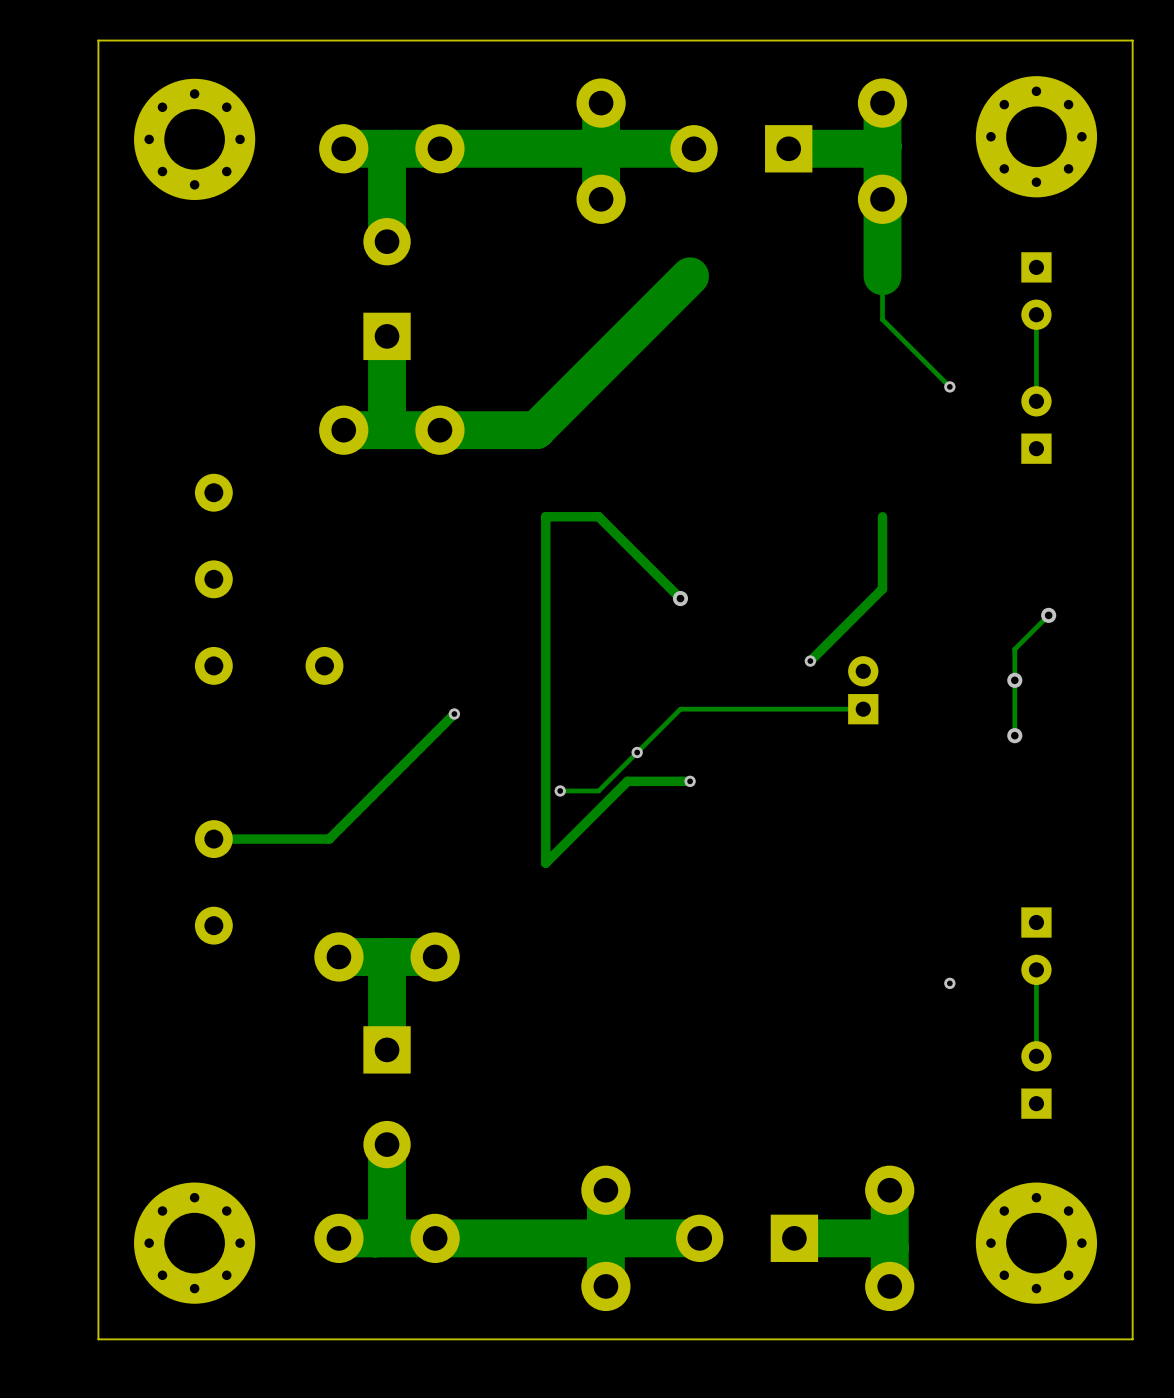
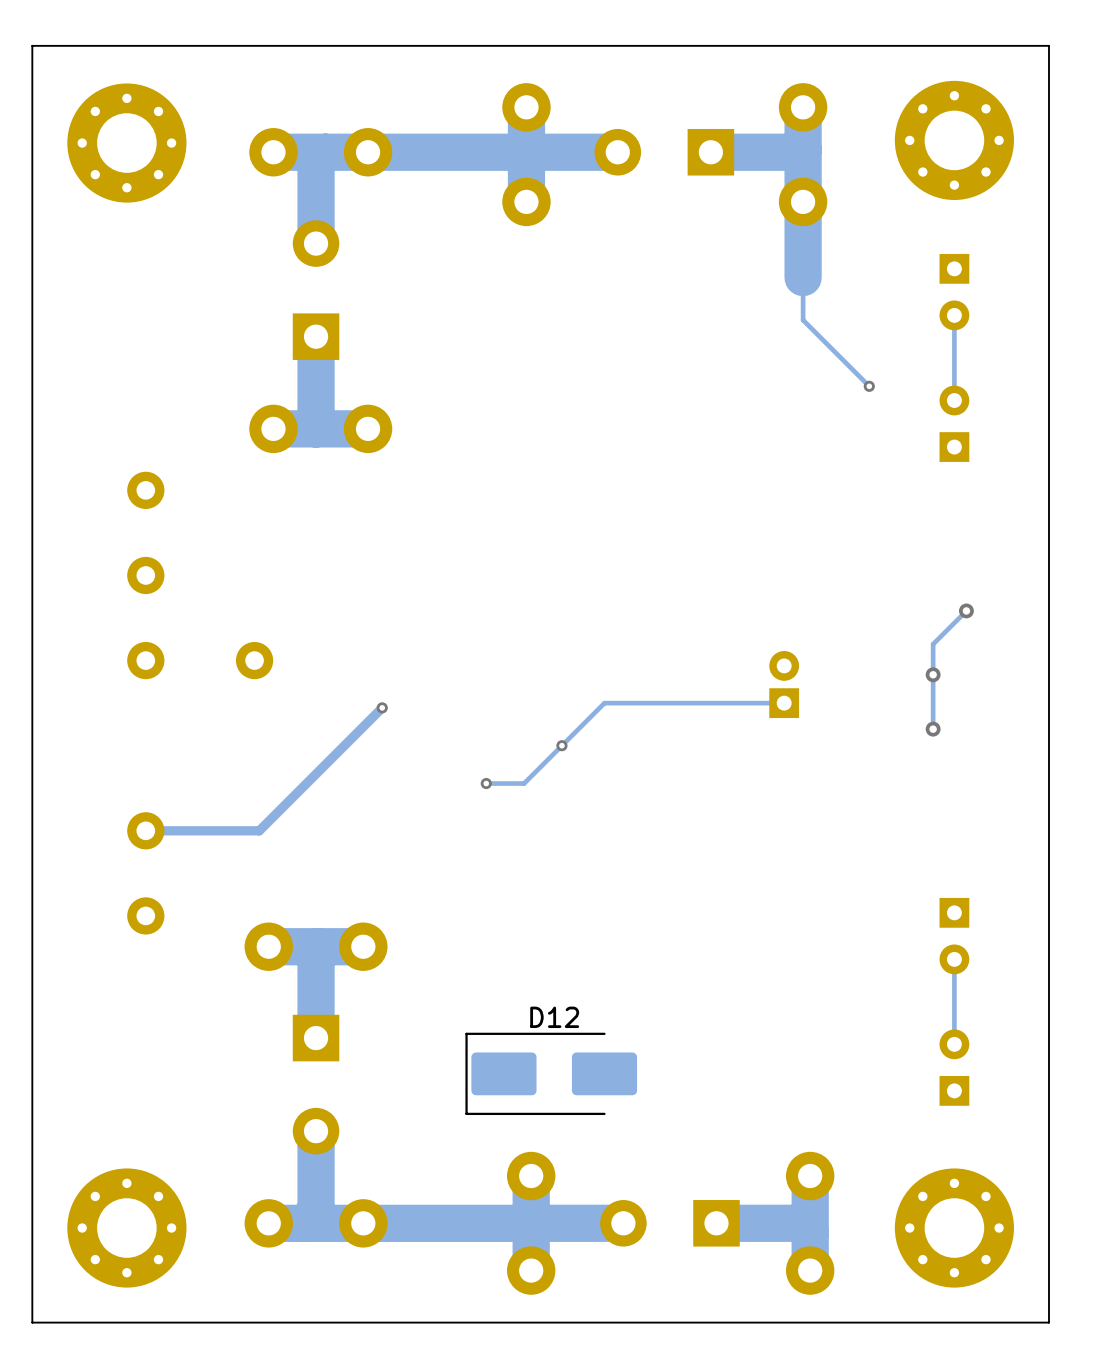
track: (690, 276) (536, 430) (439, 430) -> none
track: (882, 516) (882, 588) (810, 661) -> none
track: (680, 598) (598, 516) (545, 516) (545, 863) (627, 781) (690, 781) -> none
via: (680, 598) -> none
via: (810, 661) -> none
via: (690, 781) -> none
via: (949, 983) -> none
D12: none -> (551, 1073)

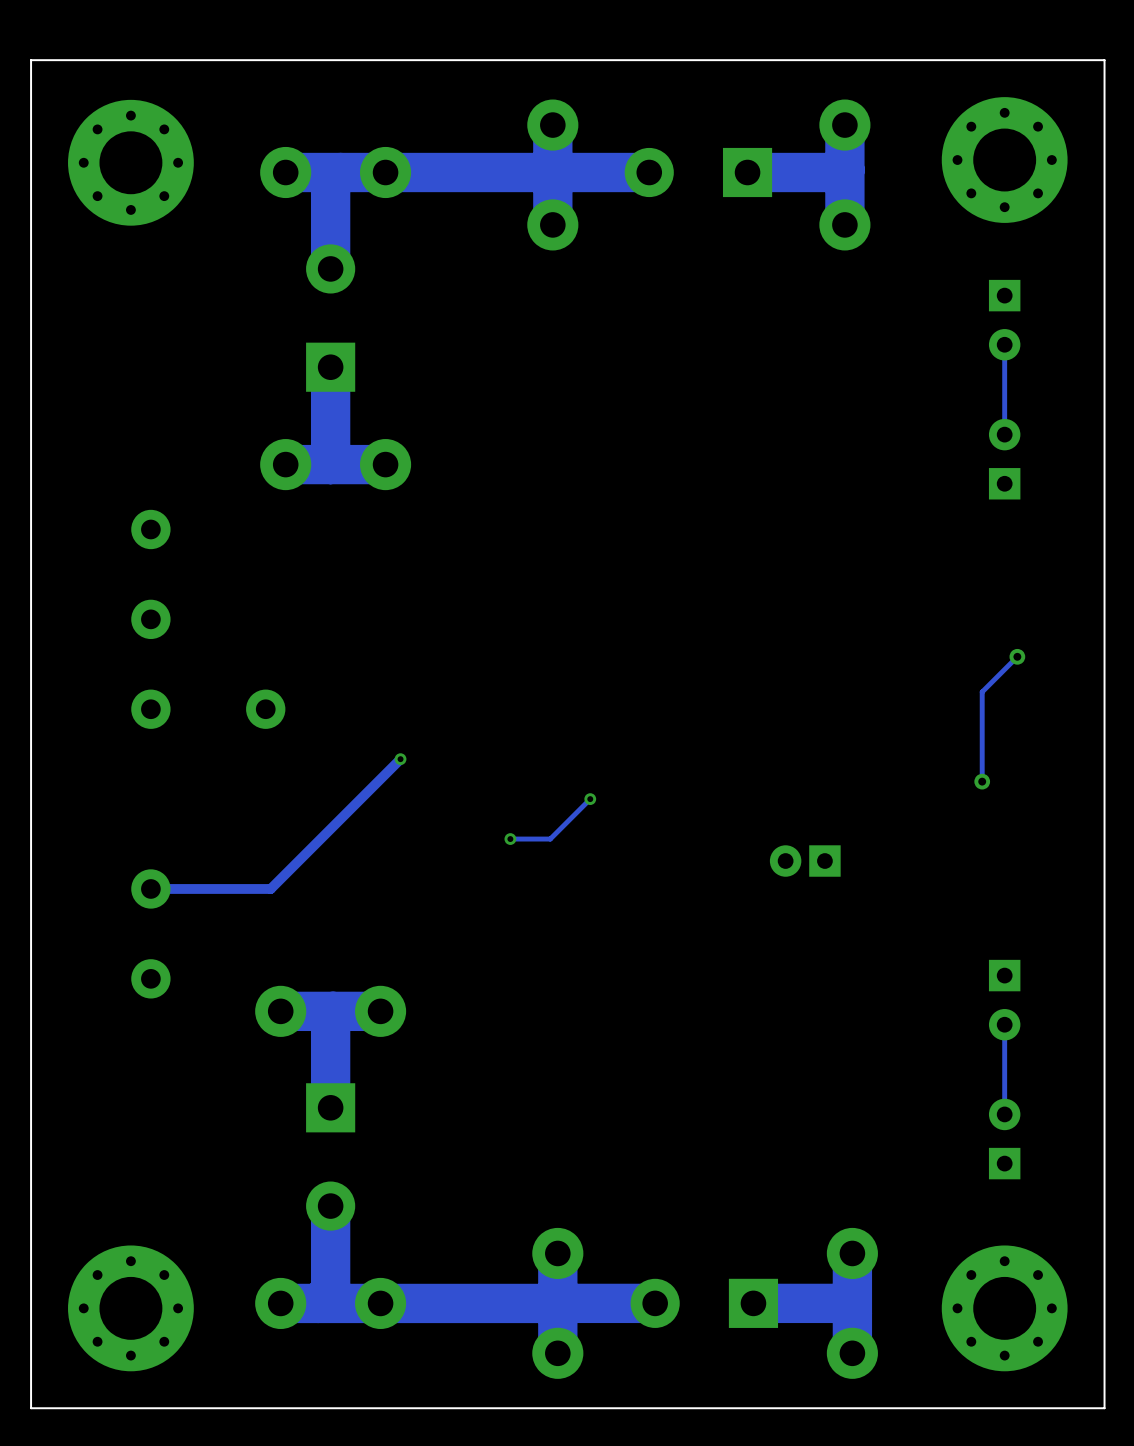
track: (803, 201) (803, 320) (869, 386) -> none
via: (869, 386) -> none
via: (933, 674) -> none
part rotation: 0° (784, 684) -> 90° counterclockwise (805, 861)
part position: (784, 684) -> (805, 861)
track: (784, 703) (604, 703) (561, 745) -> none
D12: (551, 1073) -> none

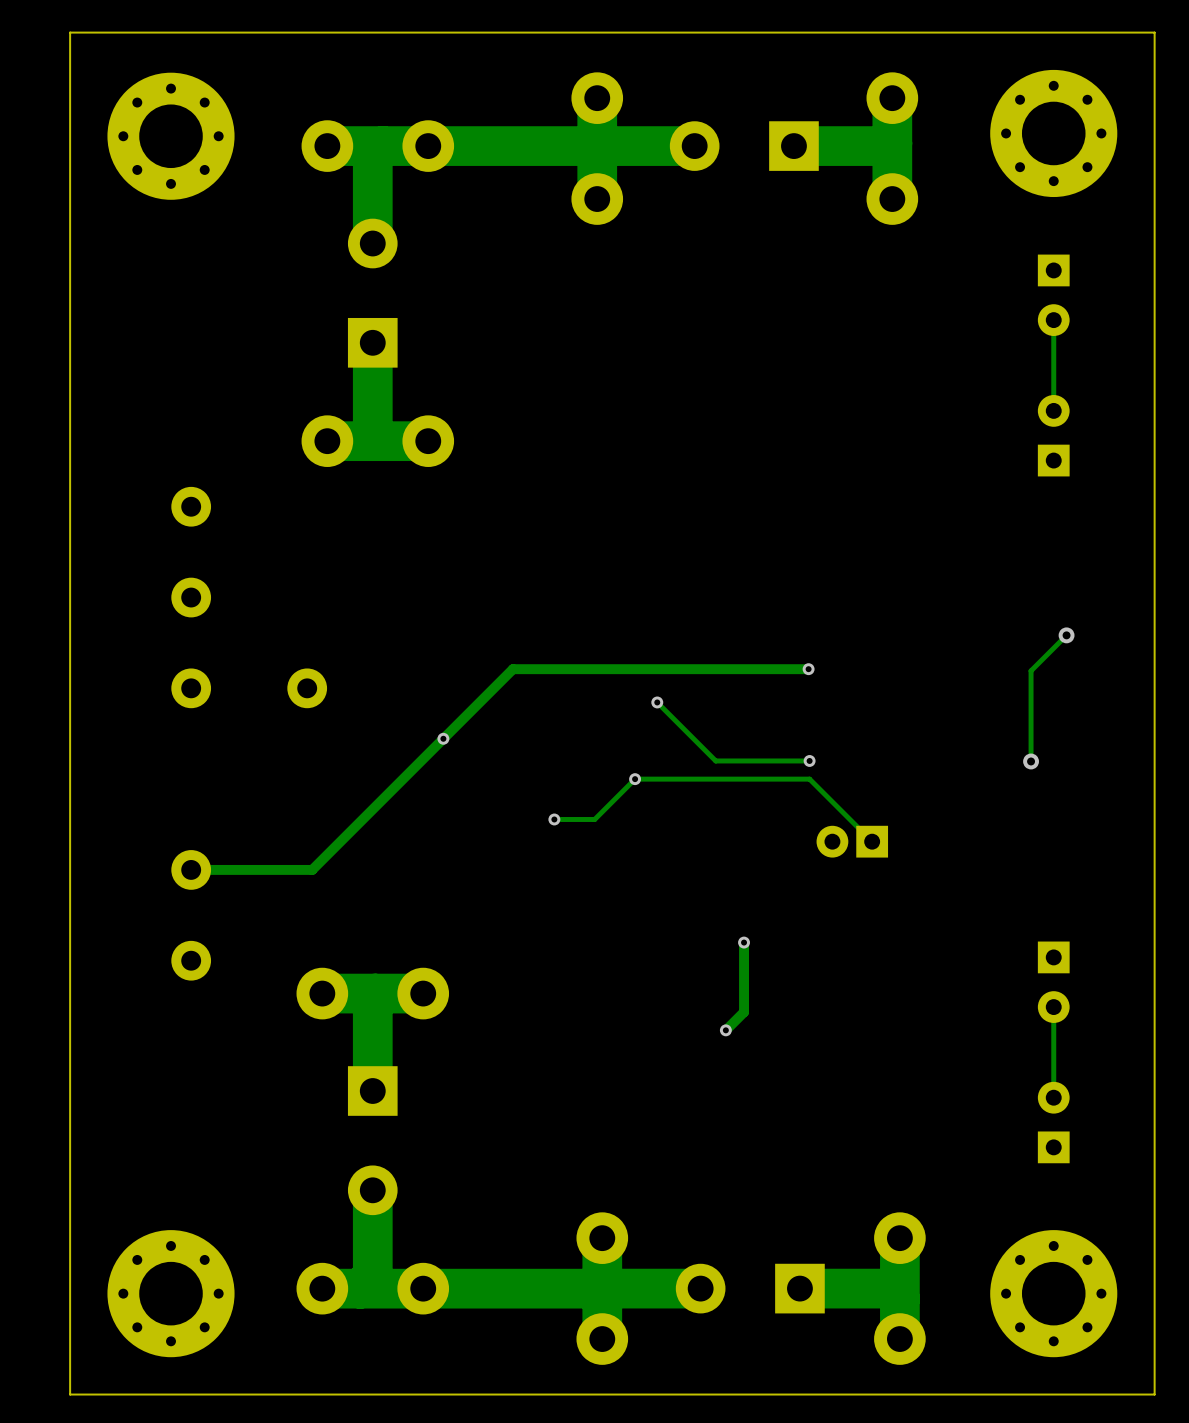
track: none -> (808, 669) (513, 669) (443, 738)
via: none -> (808, 669)
track: none -> (657, 702) (715, 760) (809, 760)
via: none -> (657, 702)
via: none -> (809, 760)
track: none -> (635, 779) (809, 779) (872, 841)
track: none -> (744, 942) (744, 1012) (725, 1030)
via: none -> (744, 942)
via: none -> (725, 1030)

